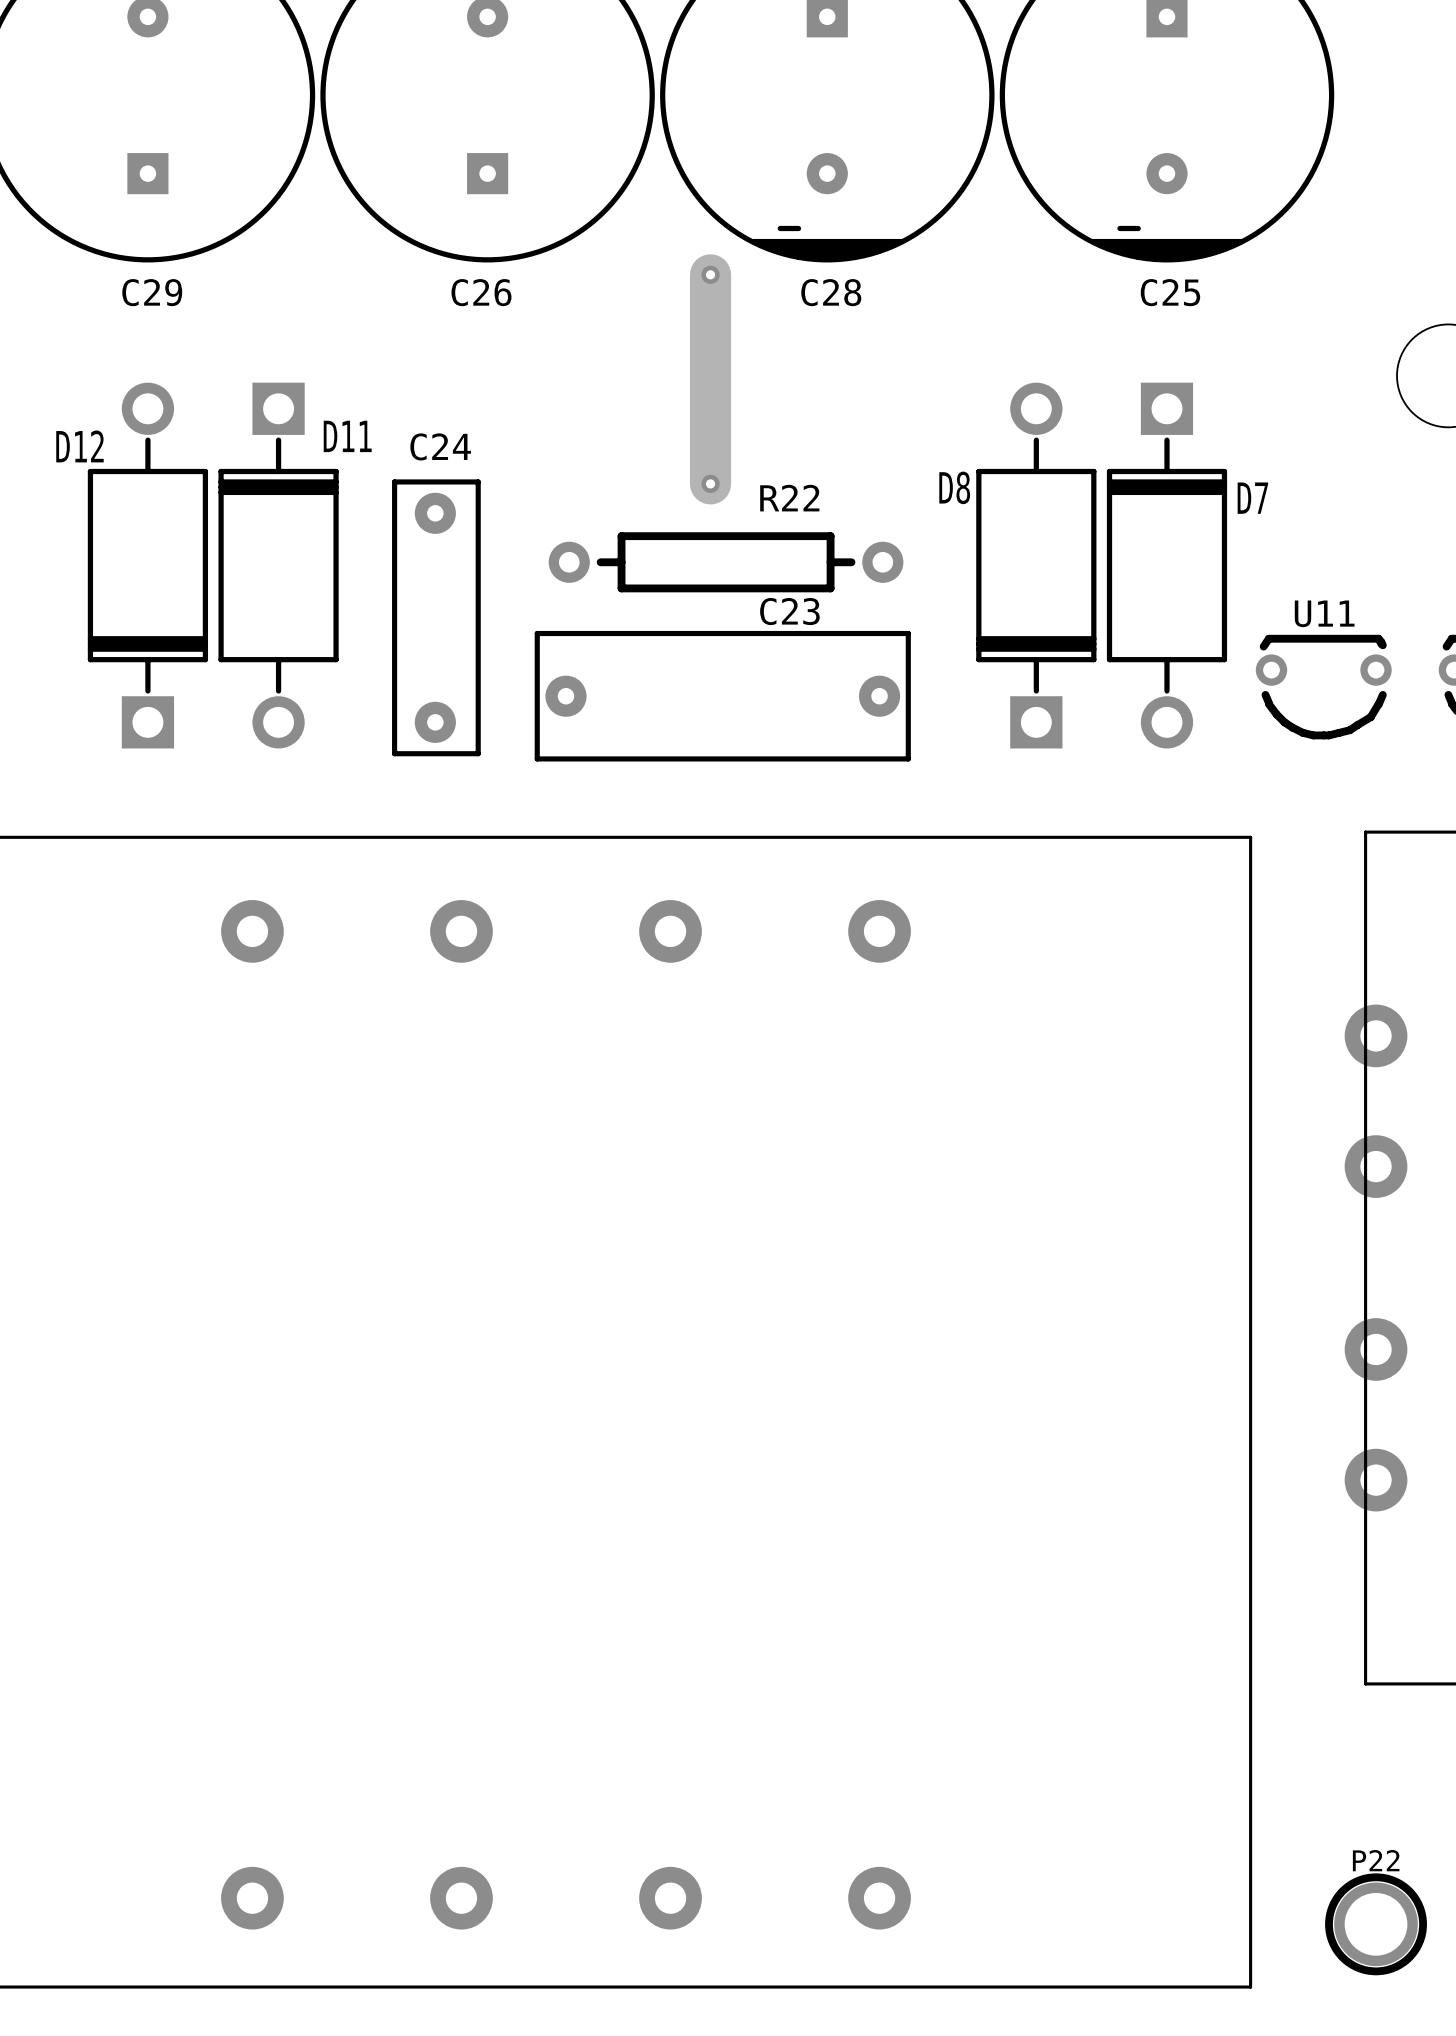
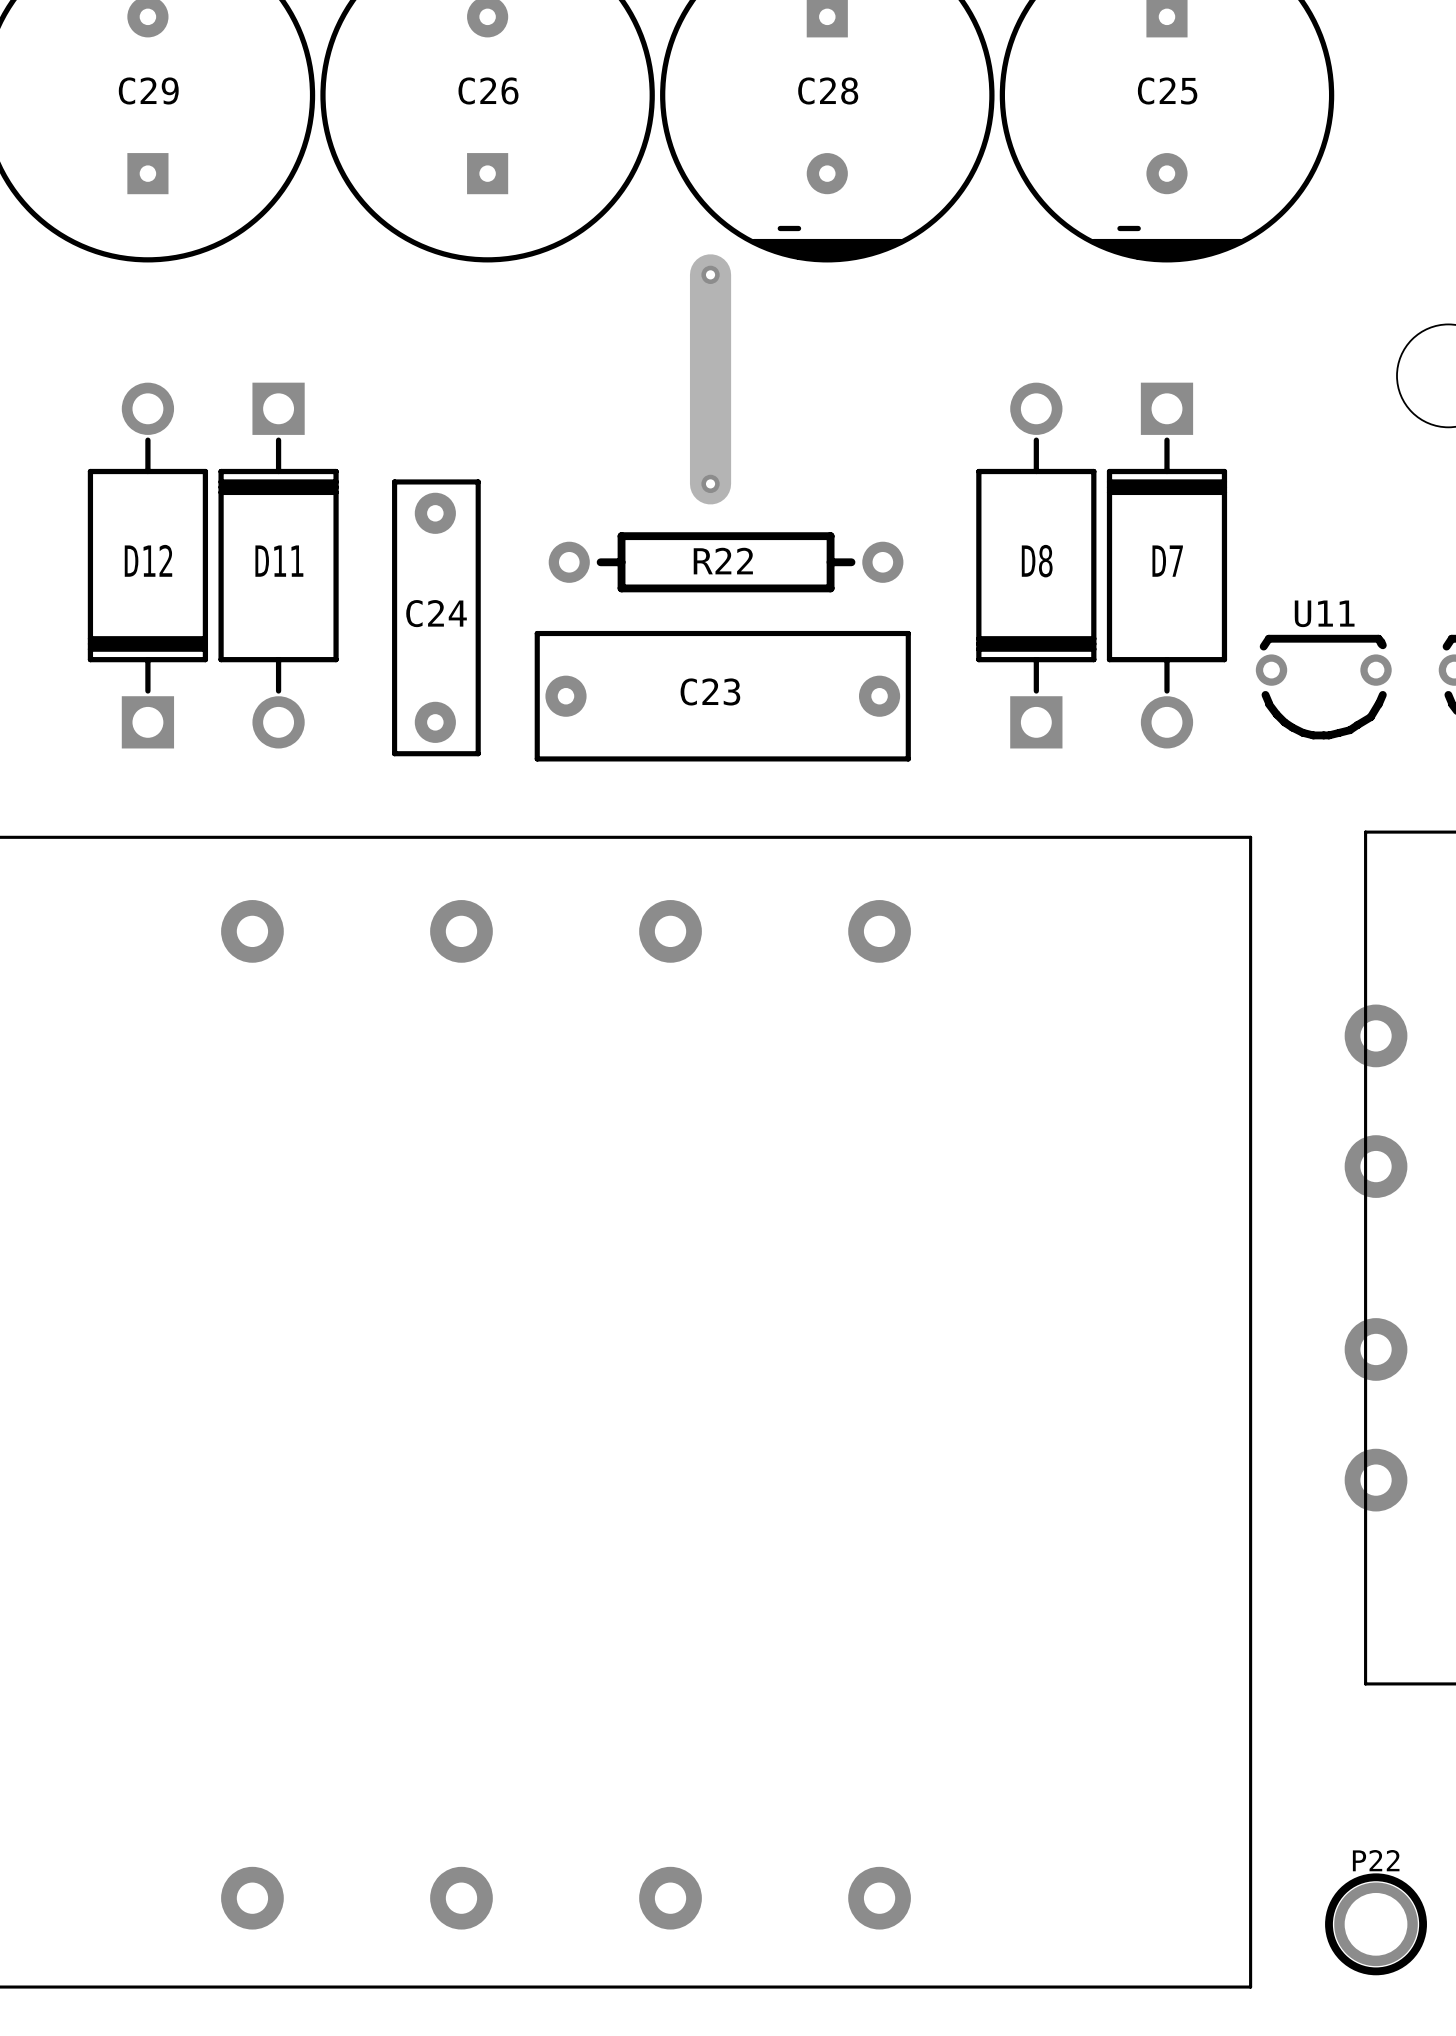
C29 name position: C29 (152, 292) -> C29 (148, 90)
C26 name position: C26 (481, 292) -> C26 (488, 90)
C28 name position: C28 (831, 292) -> C28 (828, 90)
C25 name position: C25 (1170, 292) -> C25 (1167, 90)
D11 name position: D11 (347, 436) -> D11 (279, 561)
D12 name position: D12 (79, 446) -> D12 (148, 560)
C24 name position: C24 (440, 446) -> C24 (436, 613)
D8 name position: D8 (954, 487) -> D8 (1037, 561)
R22 name position: R22 (789, 498) -> R22 (723, 561)
D7 name position: D7 (1252, 498) -> D7 (1167, 561)
C23 name position: C23 (789, 611) -> C23 (710, 691)

